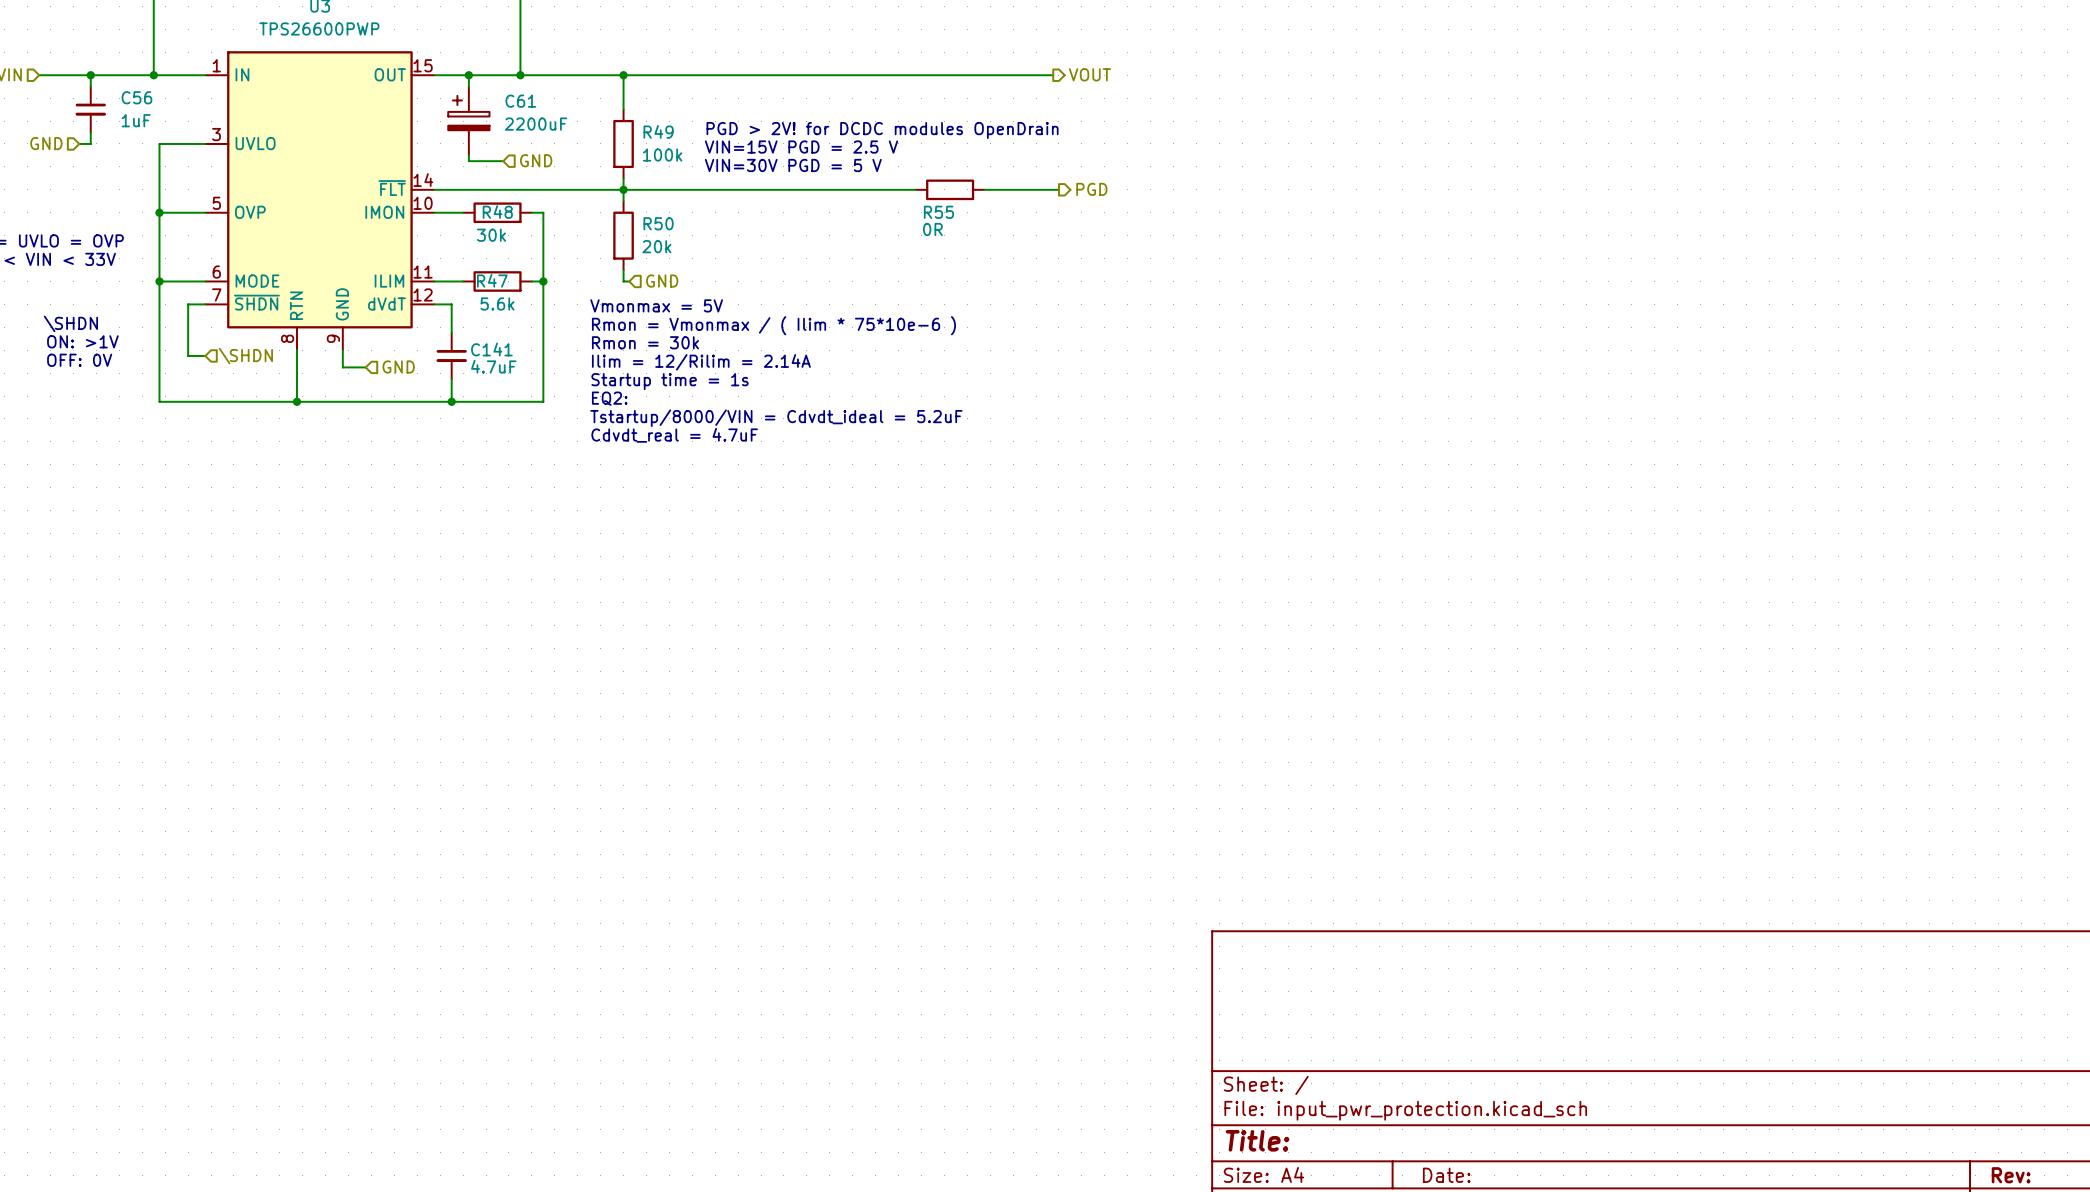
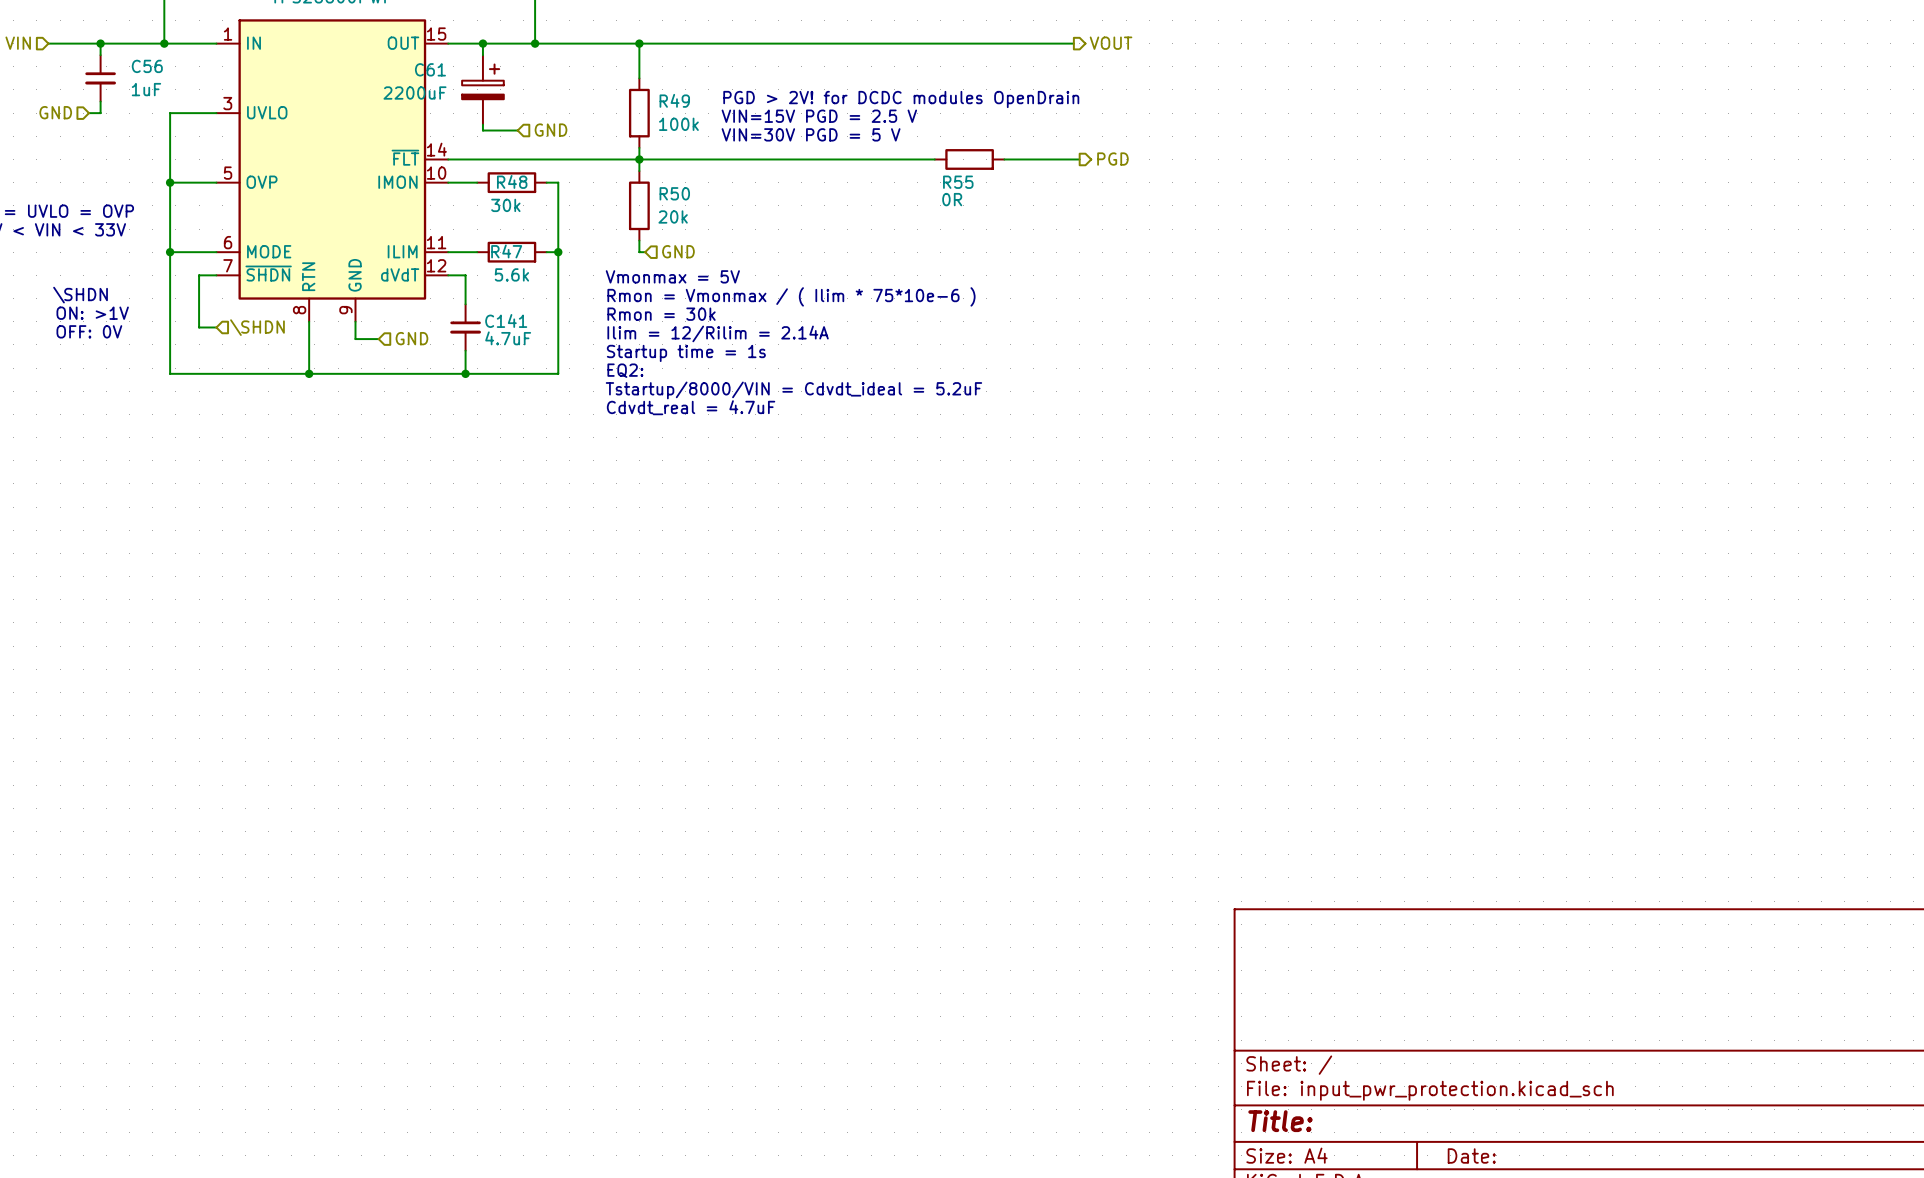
C61 flip: as is (468, 113) -> left-right (482, 81)

